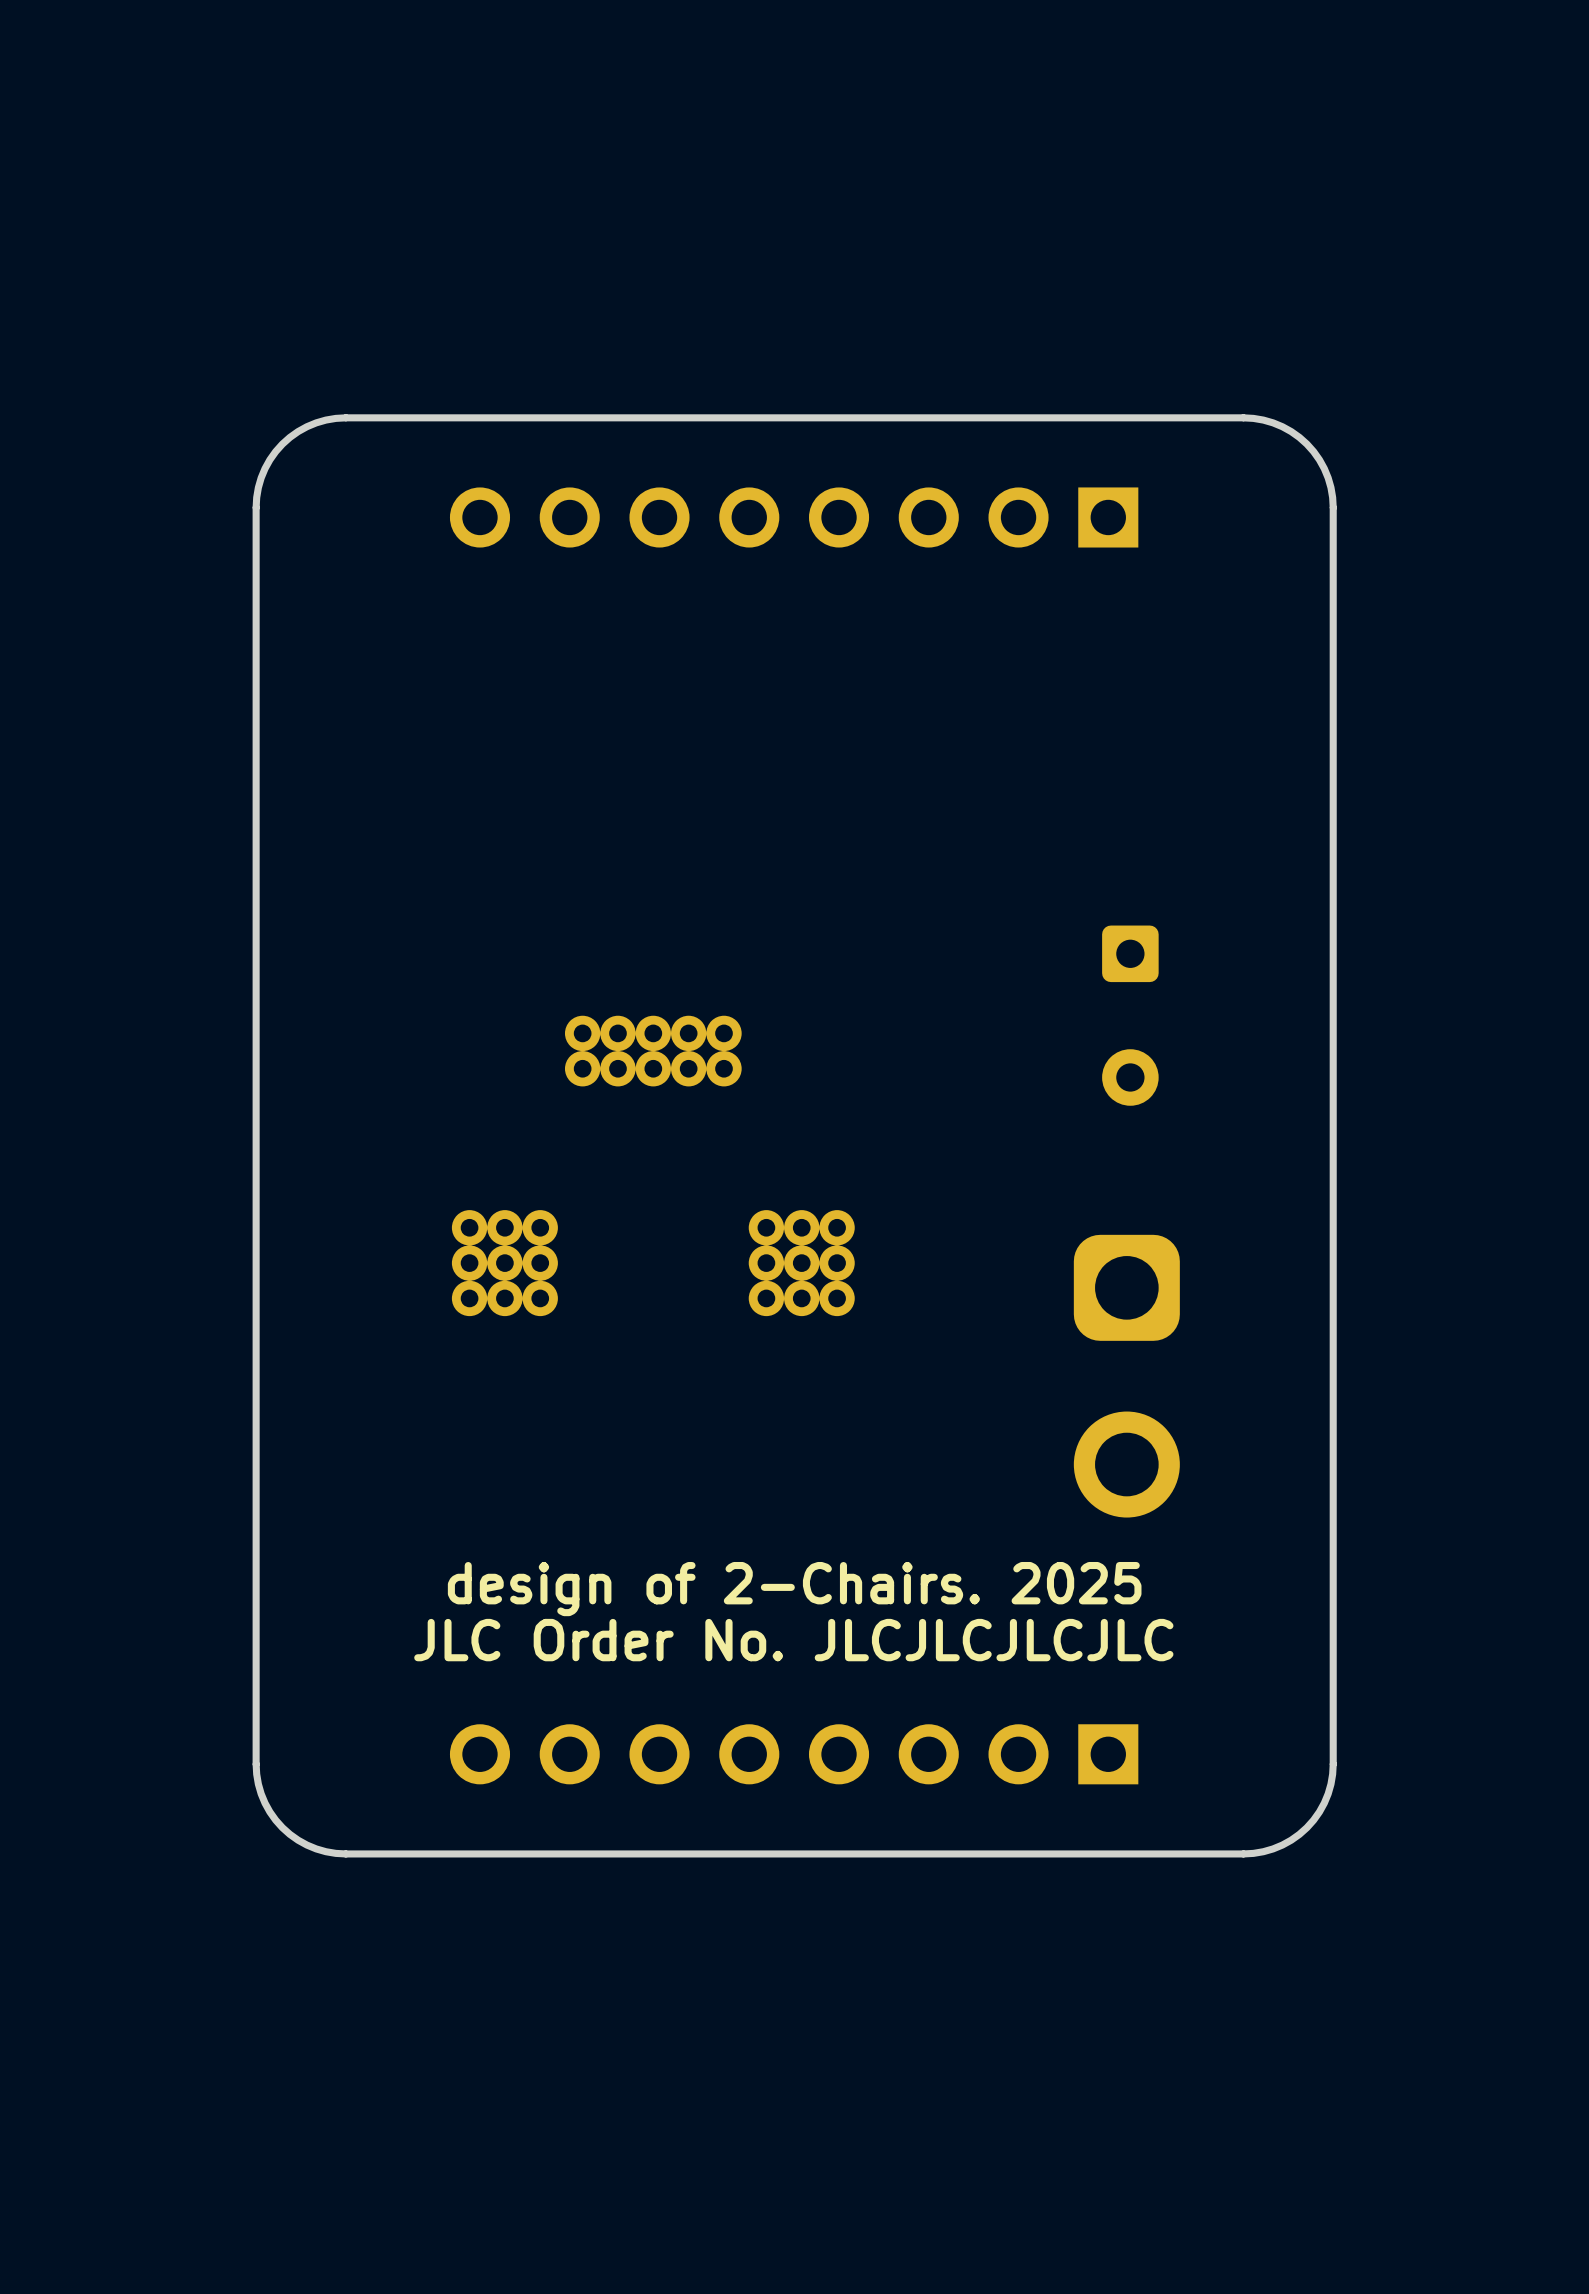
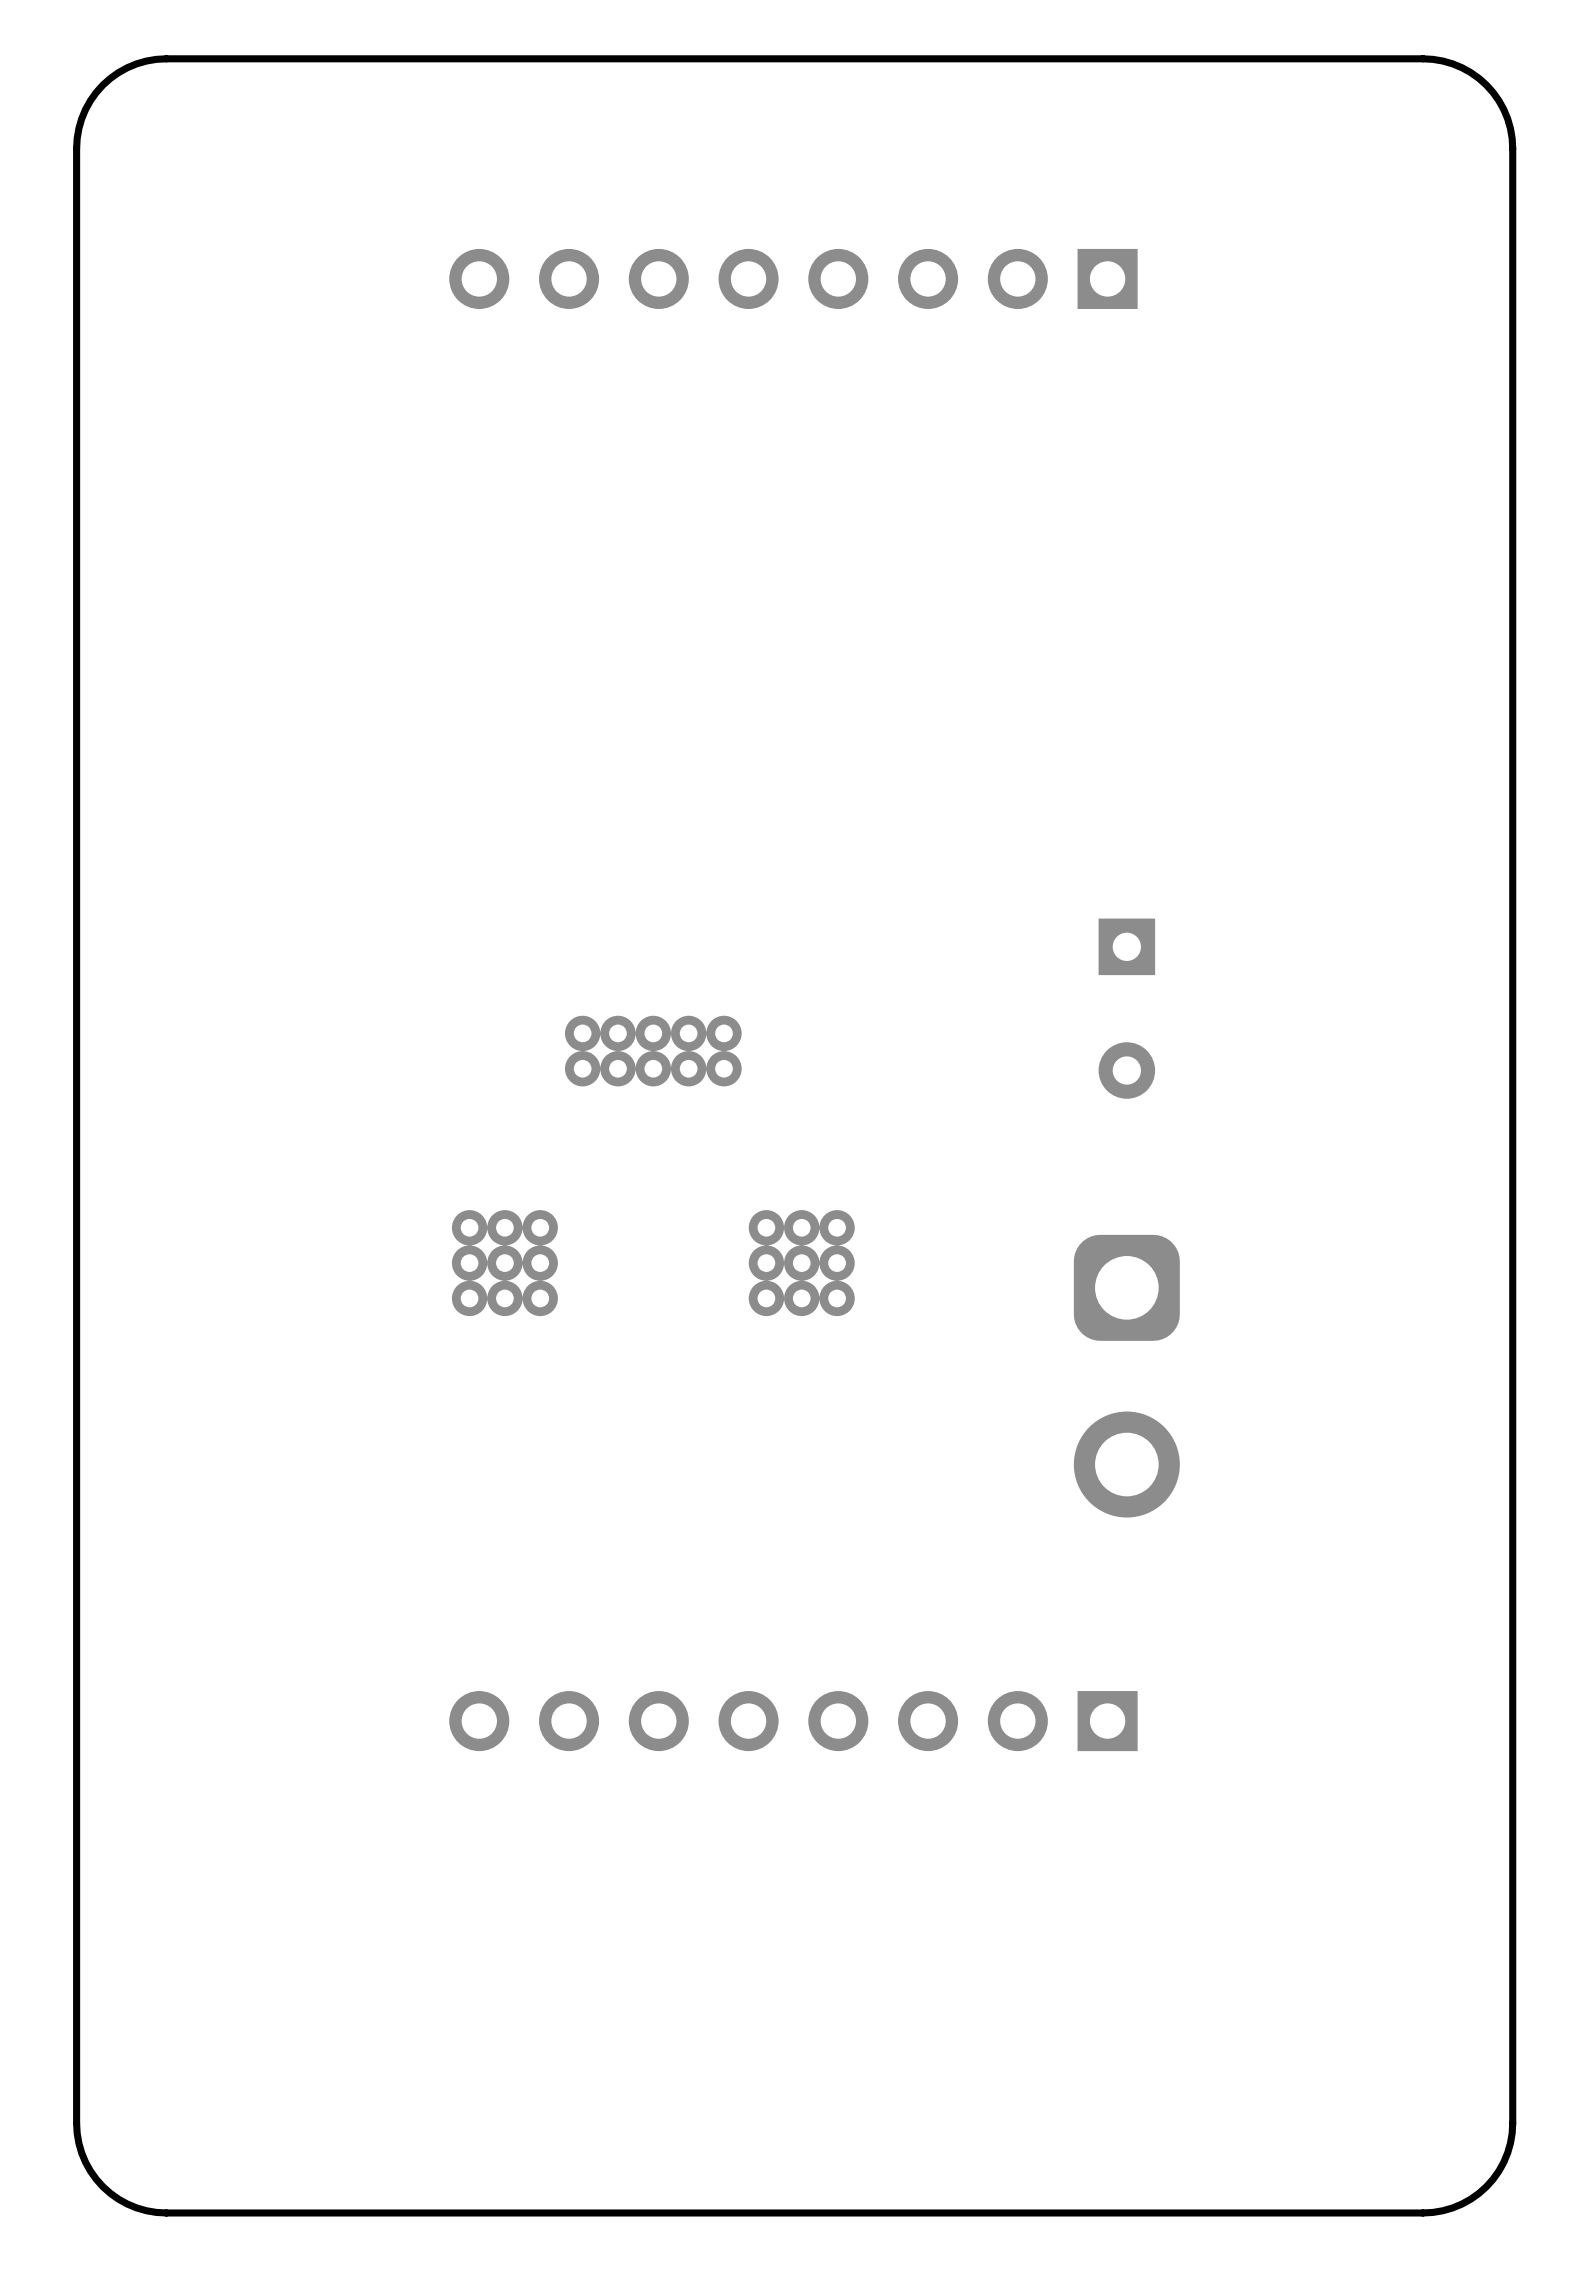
board edge: (1243, 417) (345, 417) (316, 422) (298, 431) (282, 444) (269, 459) (258, 487) (256, 507) (256, 1764) (258, 1784) (265, 1803) (275, 1820) (298, 1840) (325, 1851) (345, 1853) (1243, 1853) (1263, 1851) (1282, 1845) (1306, 1827) (1319, 1811) (1328, 1793) (1333, 1764) (1333, 507) (1328, 477) (1319, 459) (1306, 444) (1291, 431) (1273, 422) (1243, 417) -> (1422, 58) (1442, 61) (1461, 67) (1486, 85) (1503, 109) (1510, 128) (1512, 148) (1512, 2123) (1510, 2143) (1498, 2170) (1478, 2193) (1461, 2204) (1442, 2210) (1422, 2212) (166, 2212) (136, 2207) (118, 2199) (102, 2186) (90, 2170) (78, 2143) (76, 2123) (76, 148) (78, 128) (90, 100) (102, 85) (118, 72) (146, 61) (166, 58) (1422, 58)
part position: (794, 517) -> (793, 278)
part footprint: [1102, 925, 1159, 1106] -> [1098, 918, 1156, 1099]
text: design of 2-Chairs. 2025 (794, 1589) -> none
text: JLC Order No. JLCJLCJLCJLC (793, 1640) -> none
part position: (794, 1754) -> (793, 1721)

